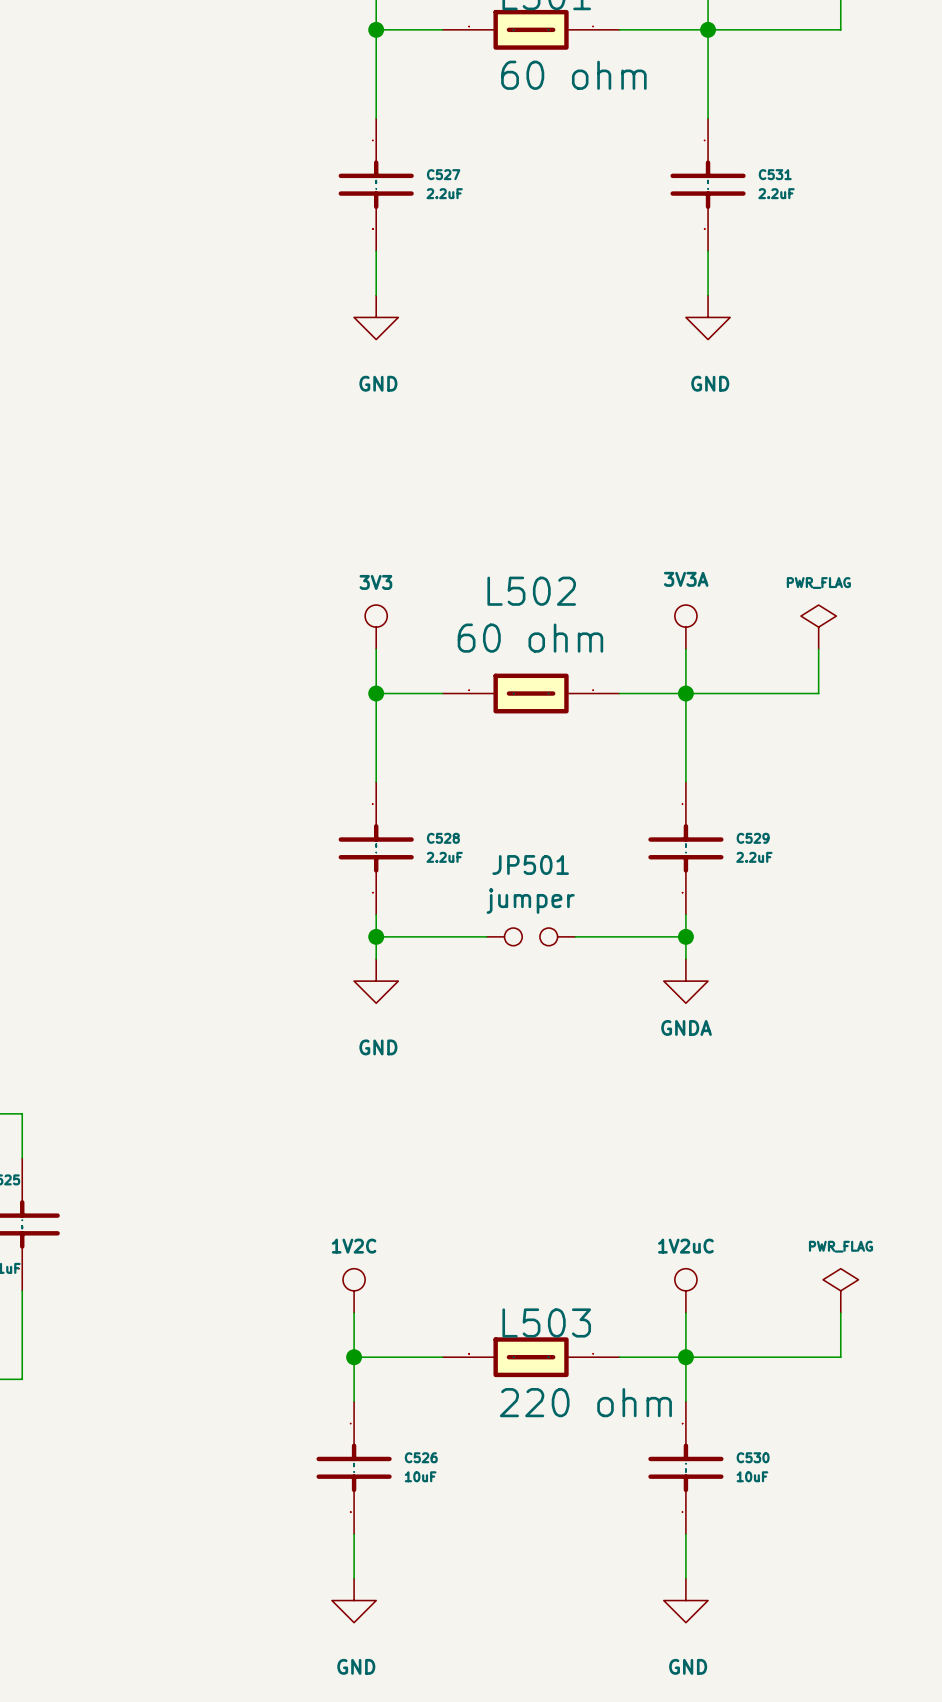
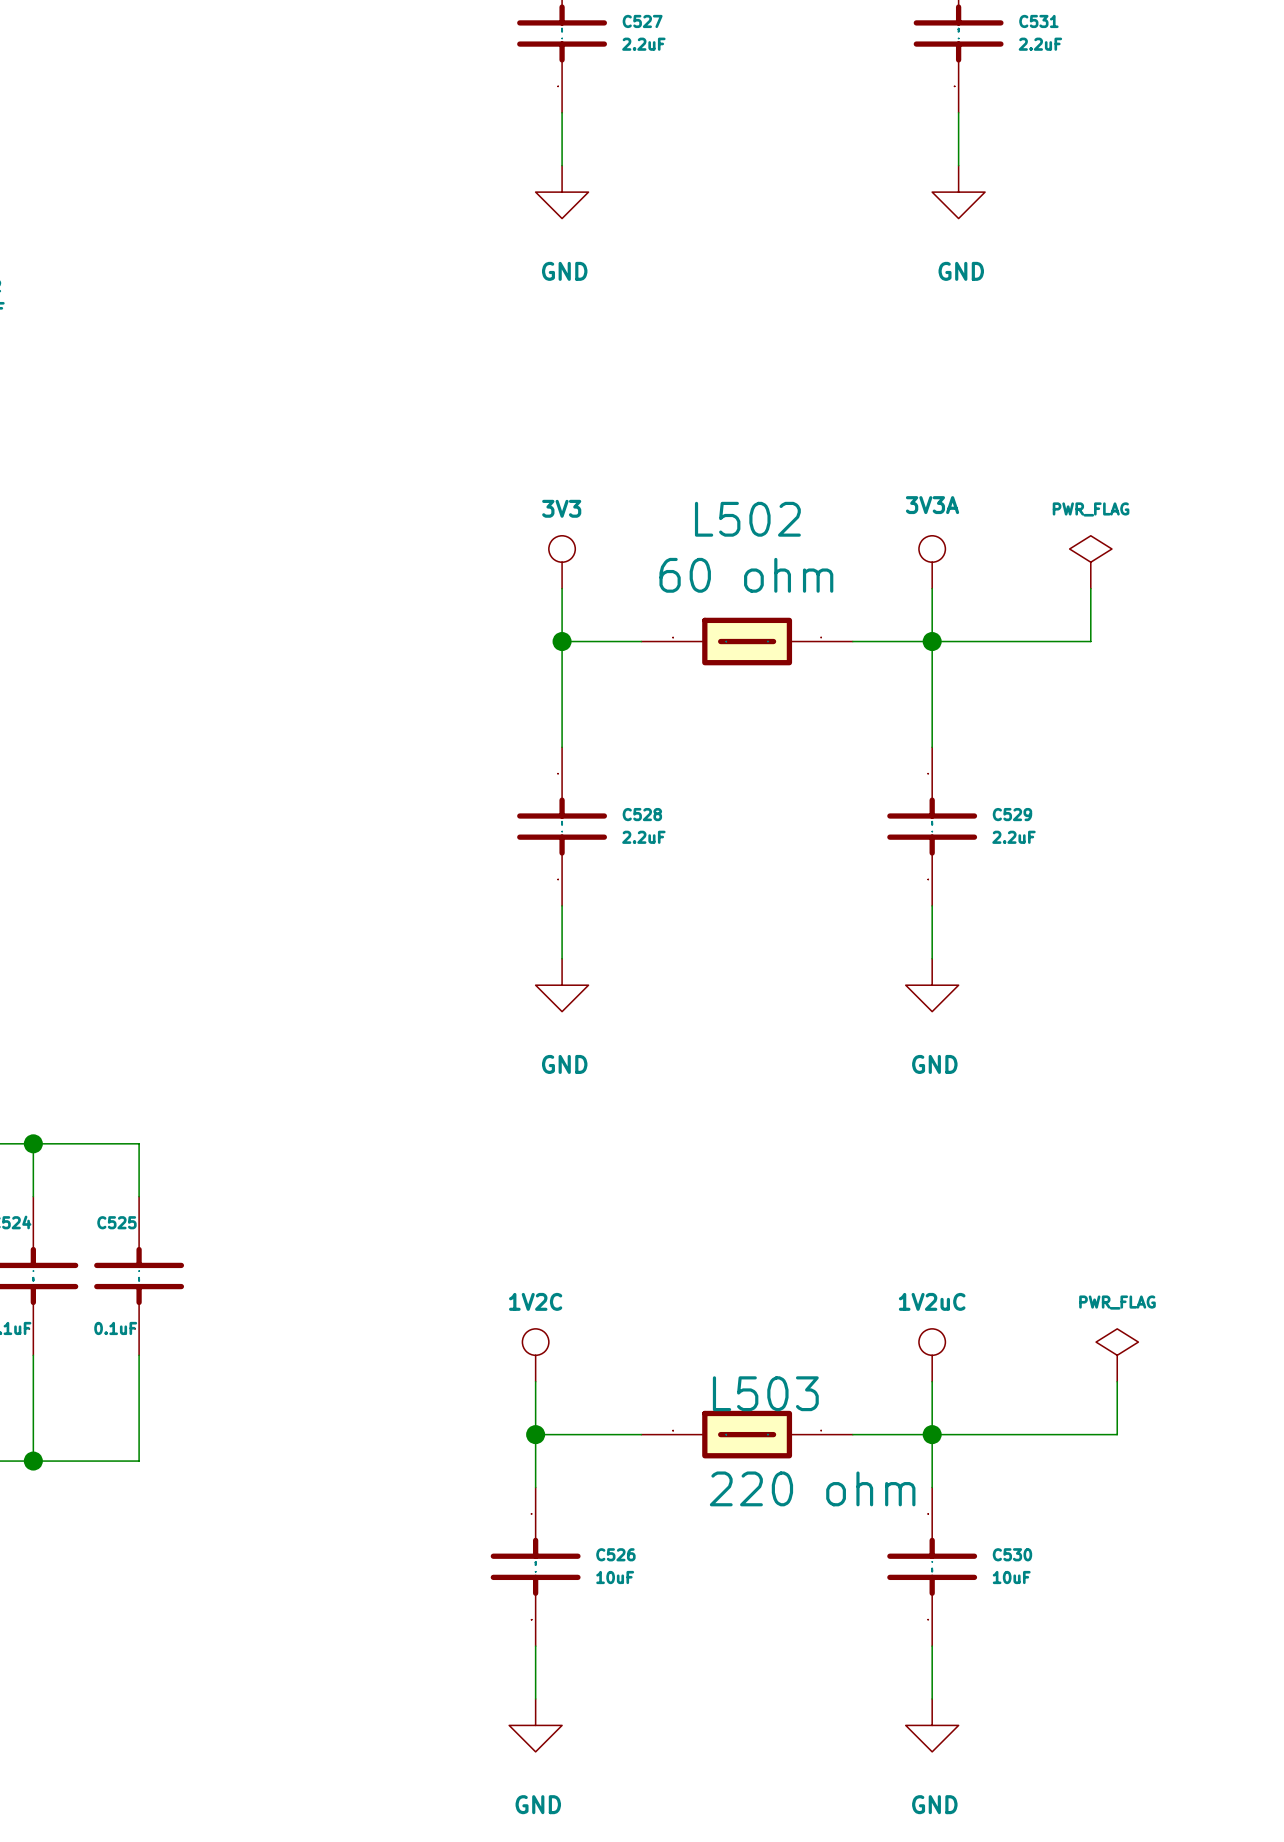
wire: (376, 936) (486, 936) -> none
junction: (376, 936) -> none
JP501: jumper (531, 936) -> none
wire: (575, 936) (685, 936) -> none
junction: (685, 936) -> none
power symbol: GNDA (685, 981) -> GND (932, 985)

